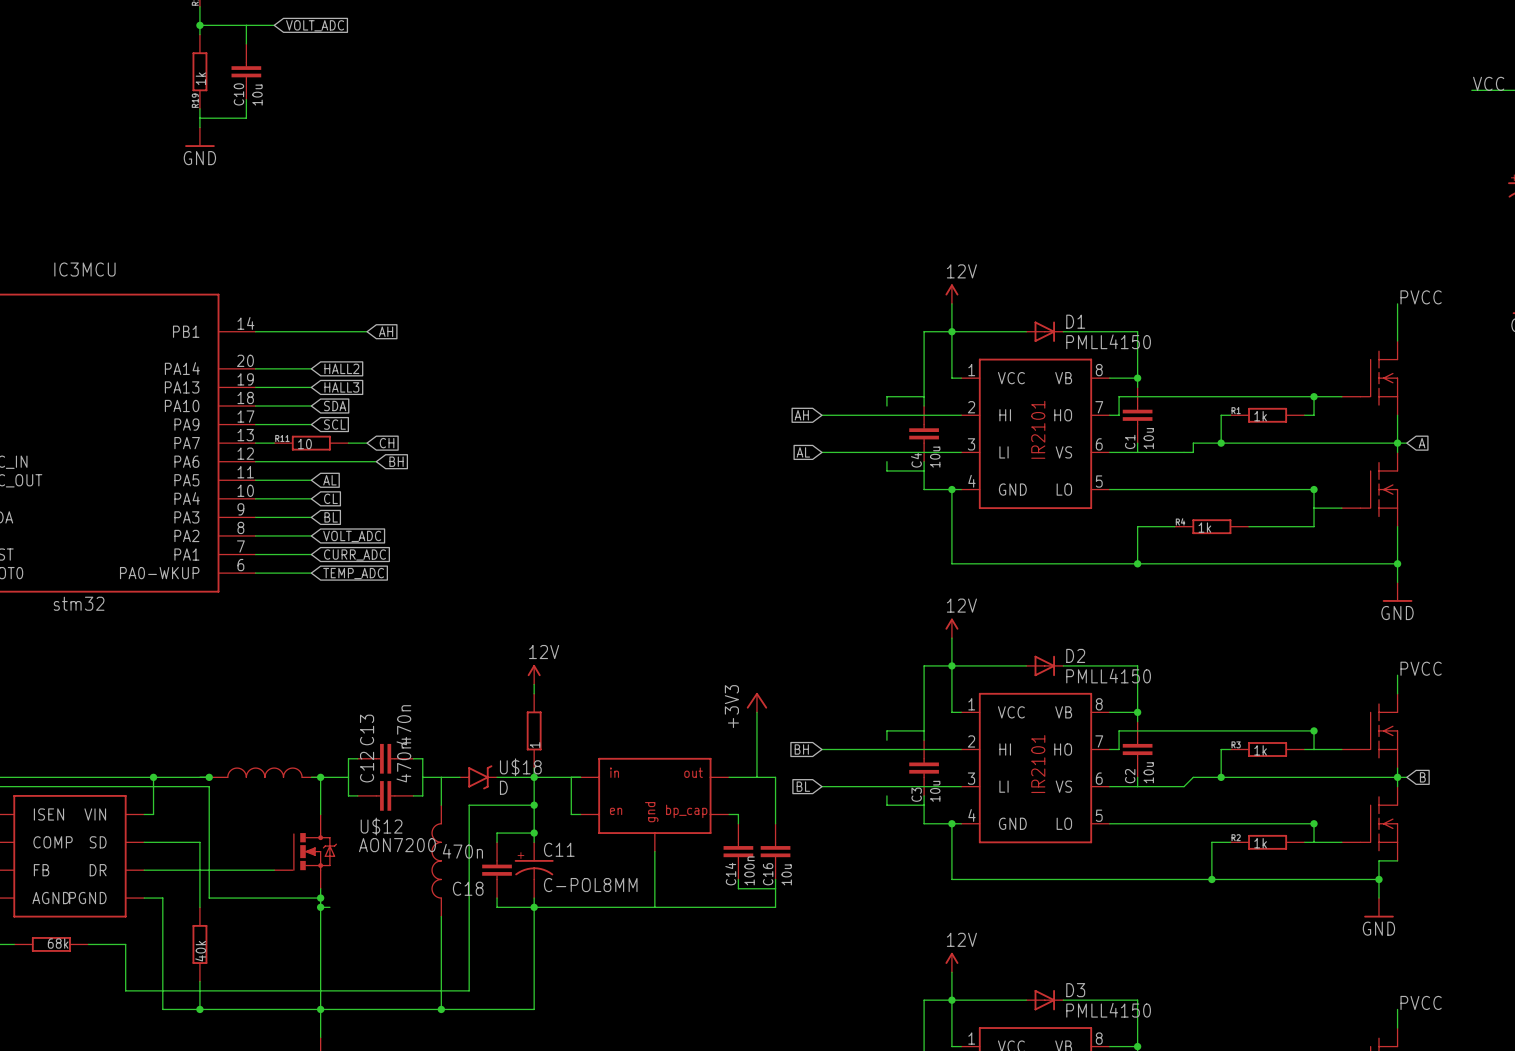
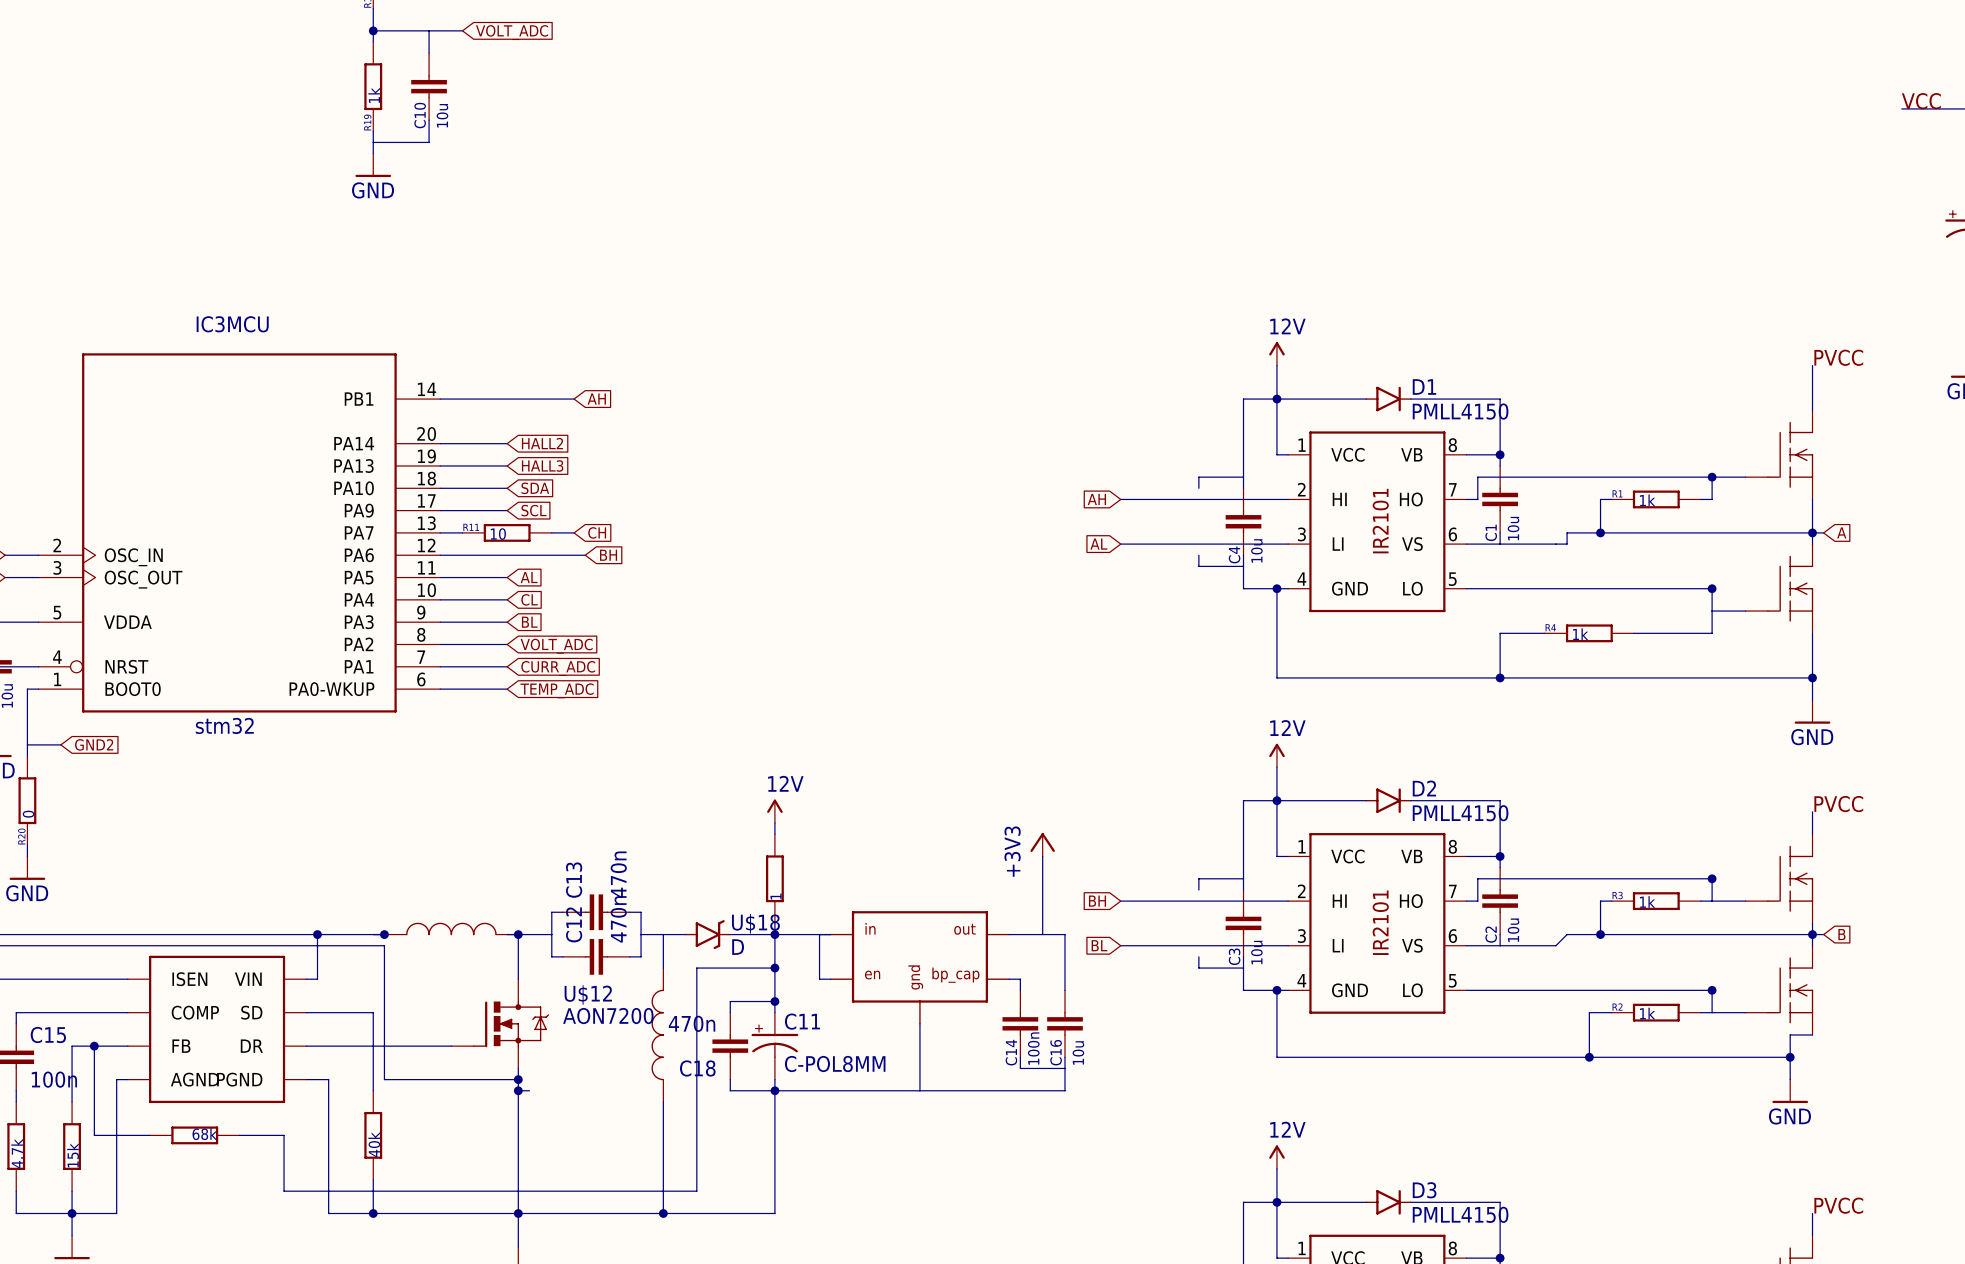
D1 symbol: [1026, 321, 1064, 342] -> [1365, 386, 1412, 412]
D2 symbol: [1026, 655, 1064, 677] -> [1365, 788, 1412, 813]
U$12 symbol: [274, 814, 337, 889] -> [451, 979, 550, 1069]
D3 symbol: [1026, 989, 1064, 1011] -> [1365, 1190, 1412, 1215]

